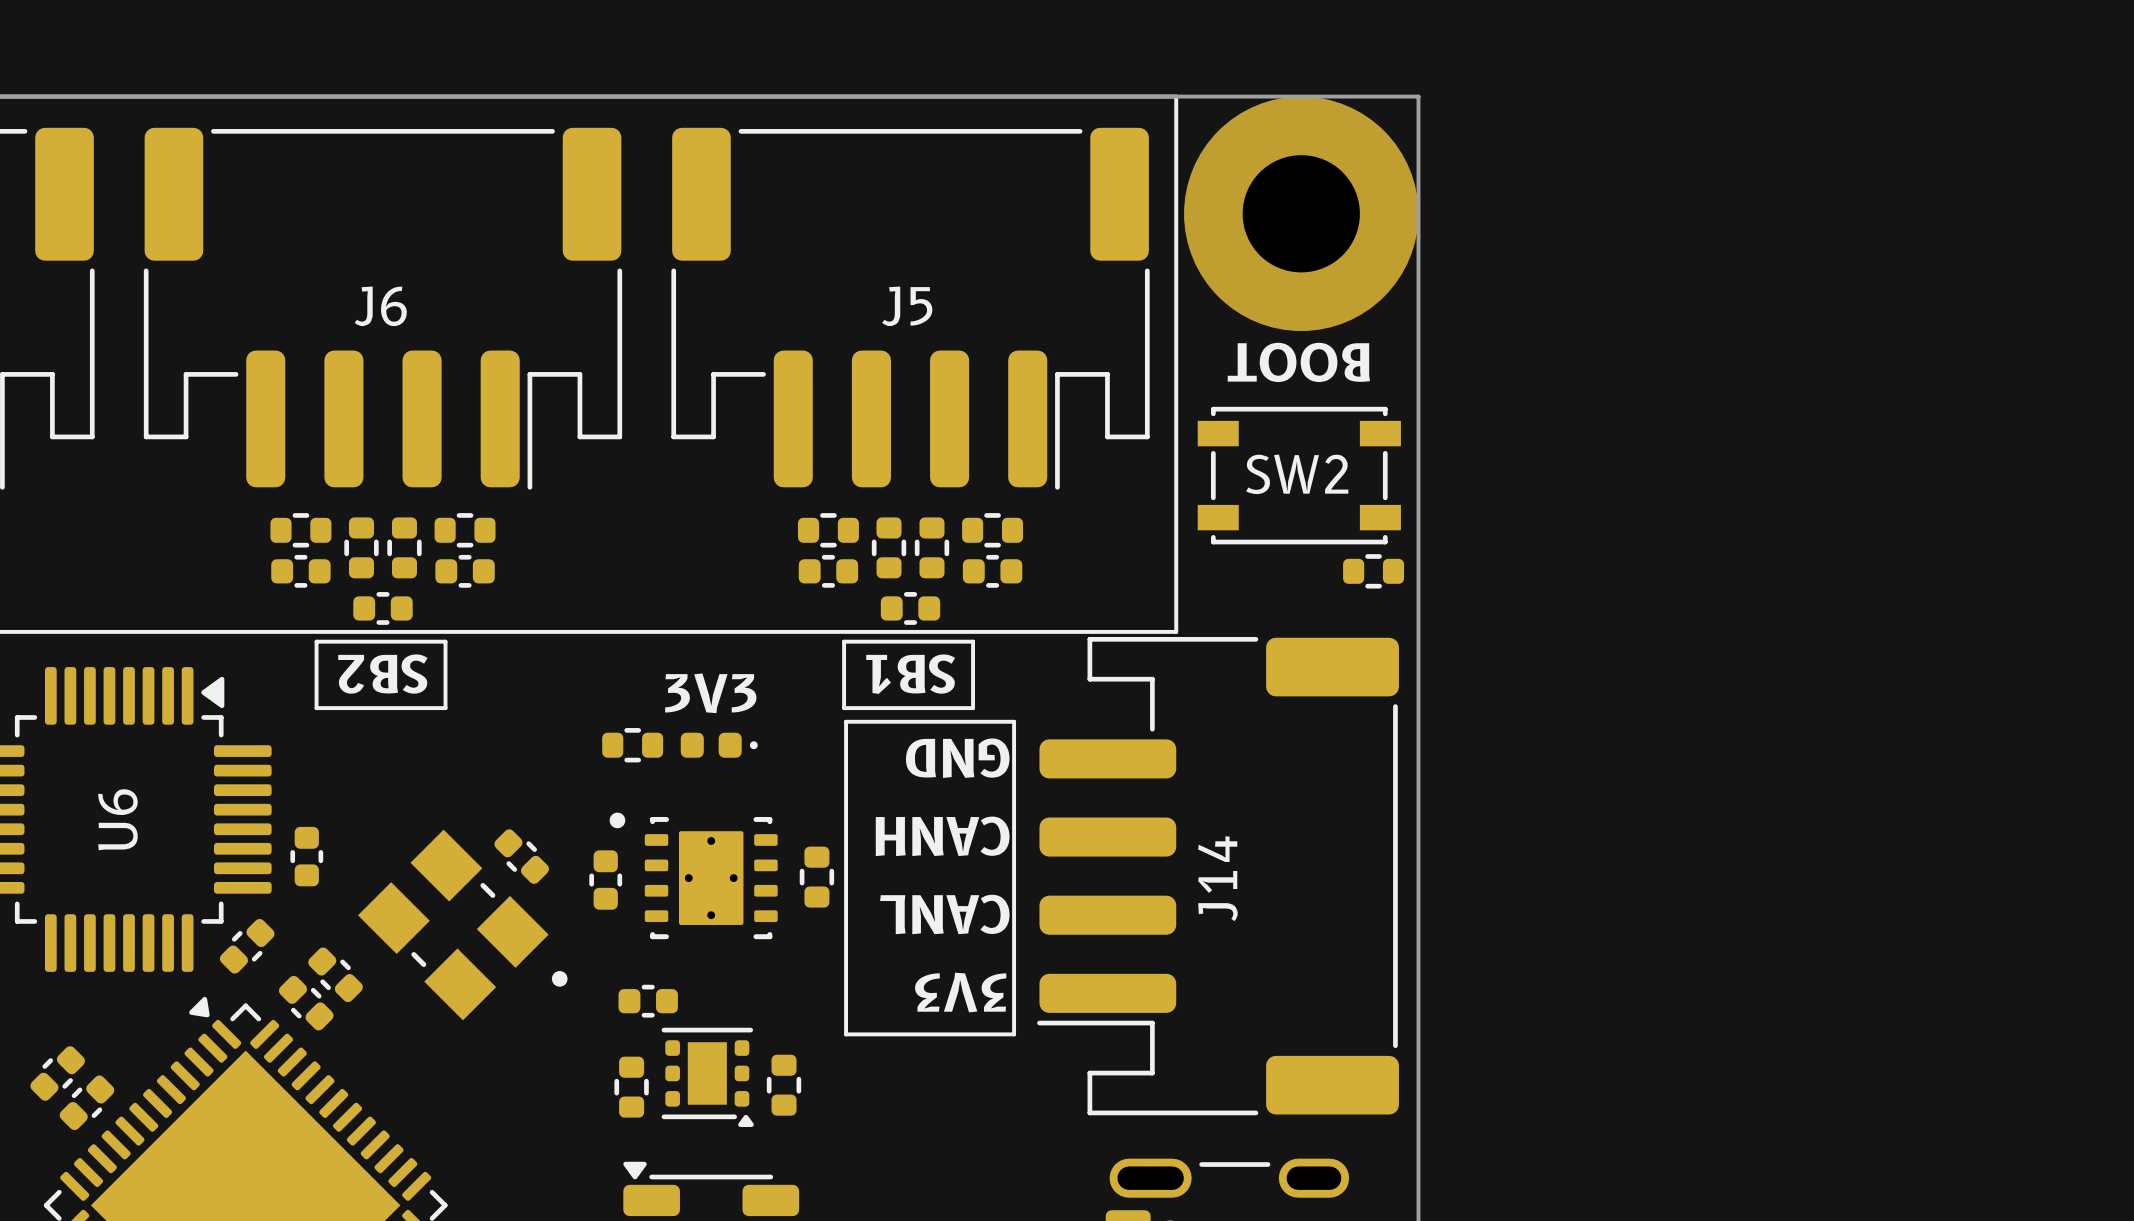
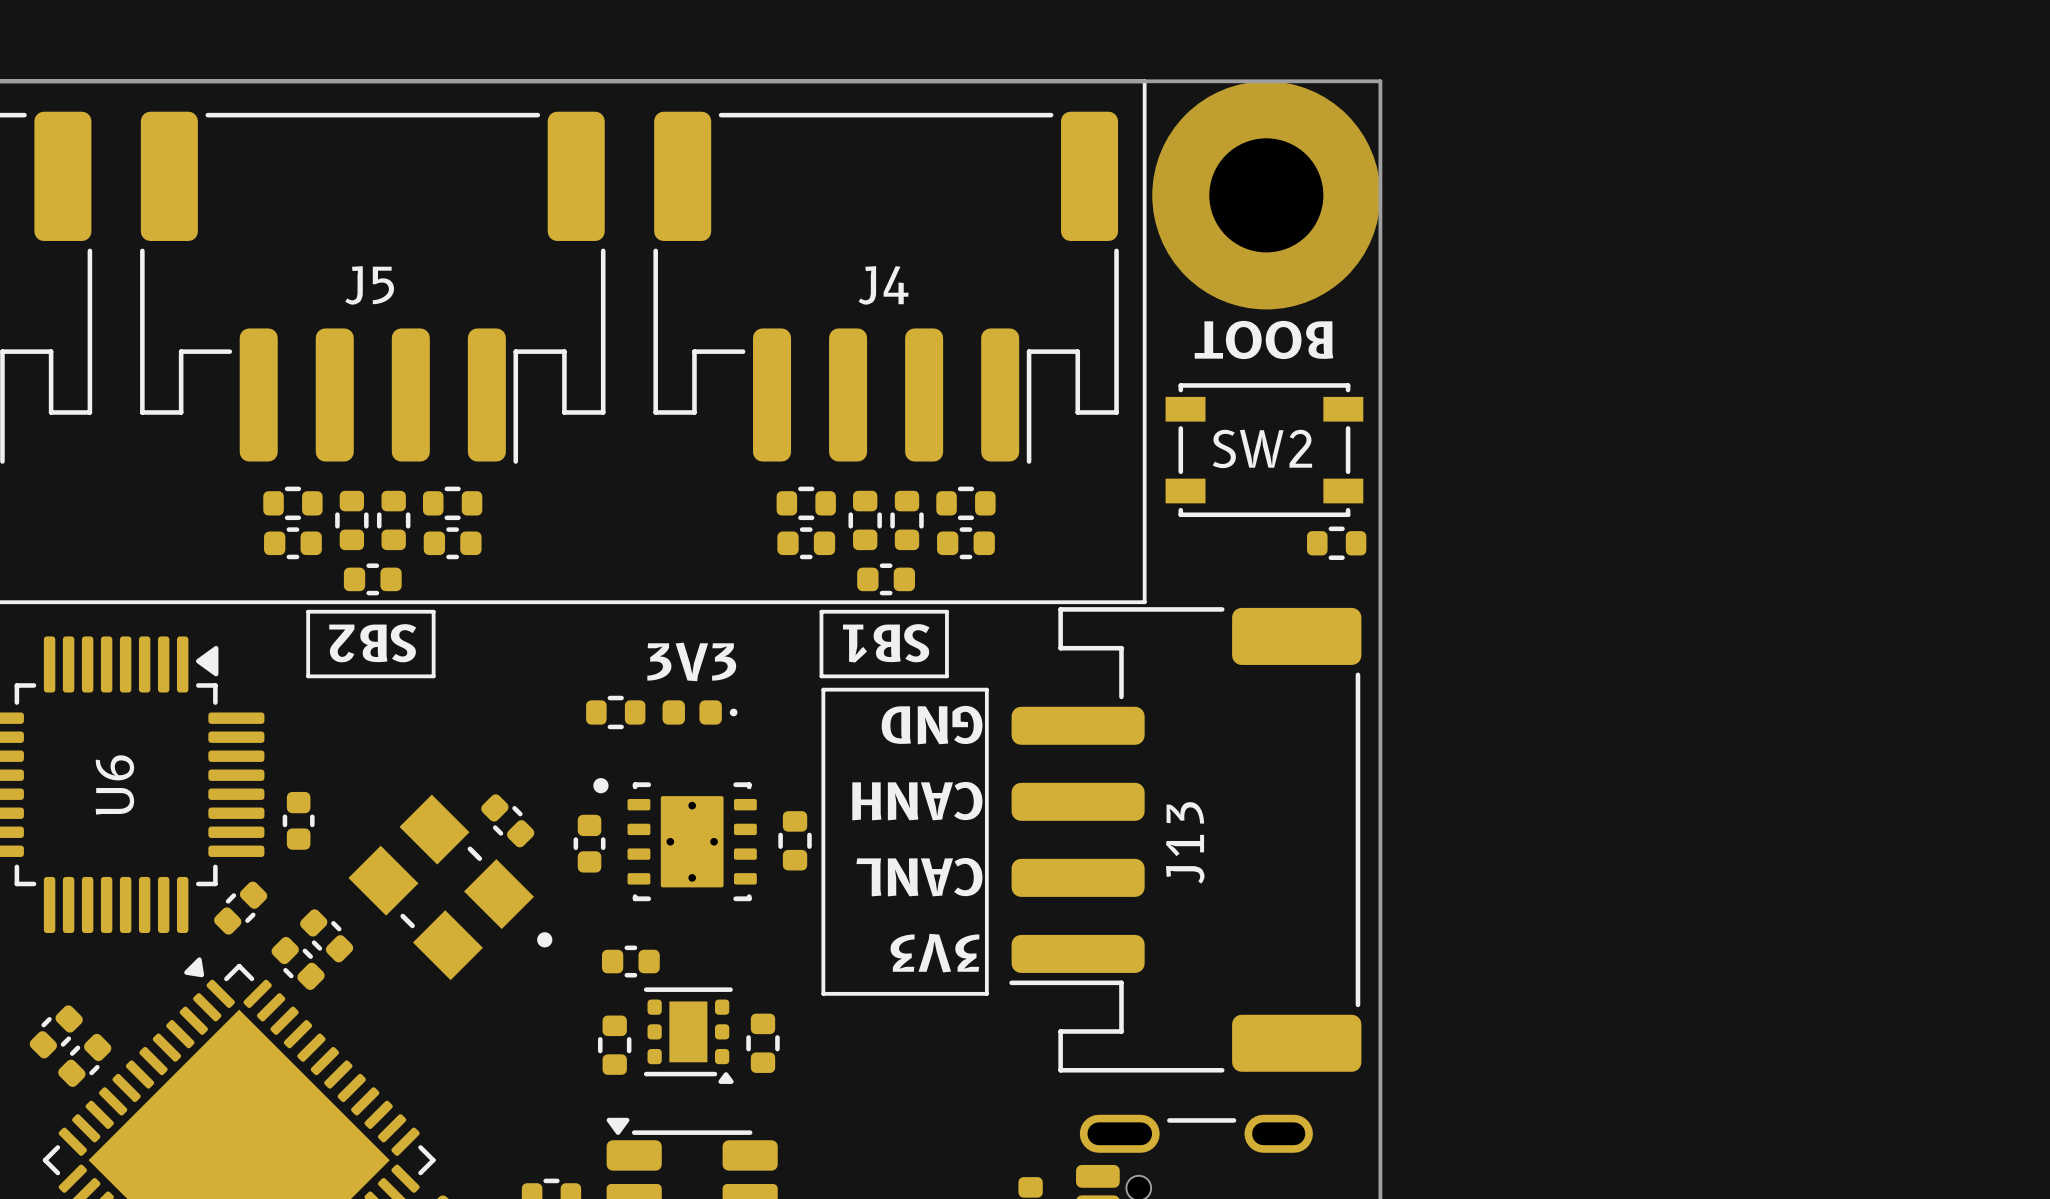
J6 name: J6 (380, 306) -> J5 (369, 285)
J5 name: J5 (907, 306) -> J4 (883, 285)
J14 name: J14 (1217, 878) -> J13 (1185, 842)

